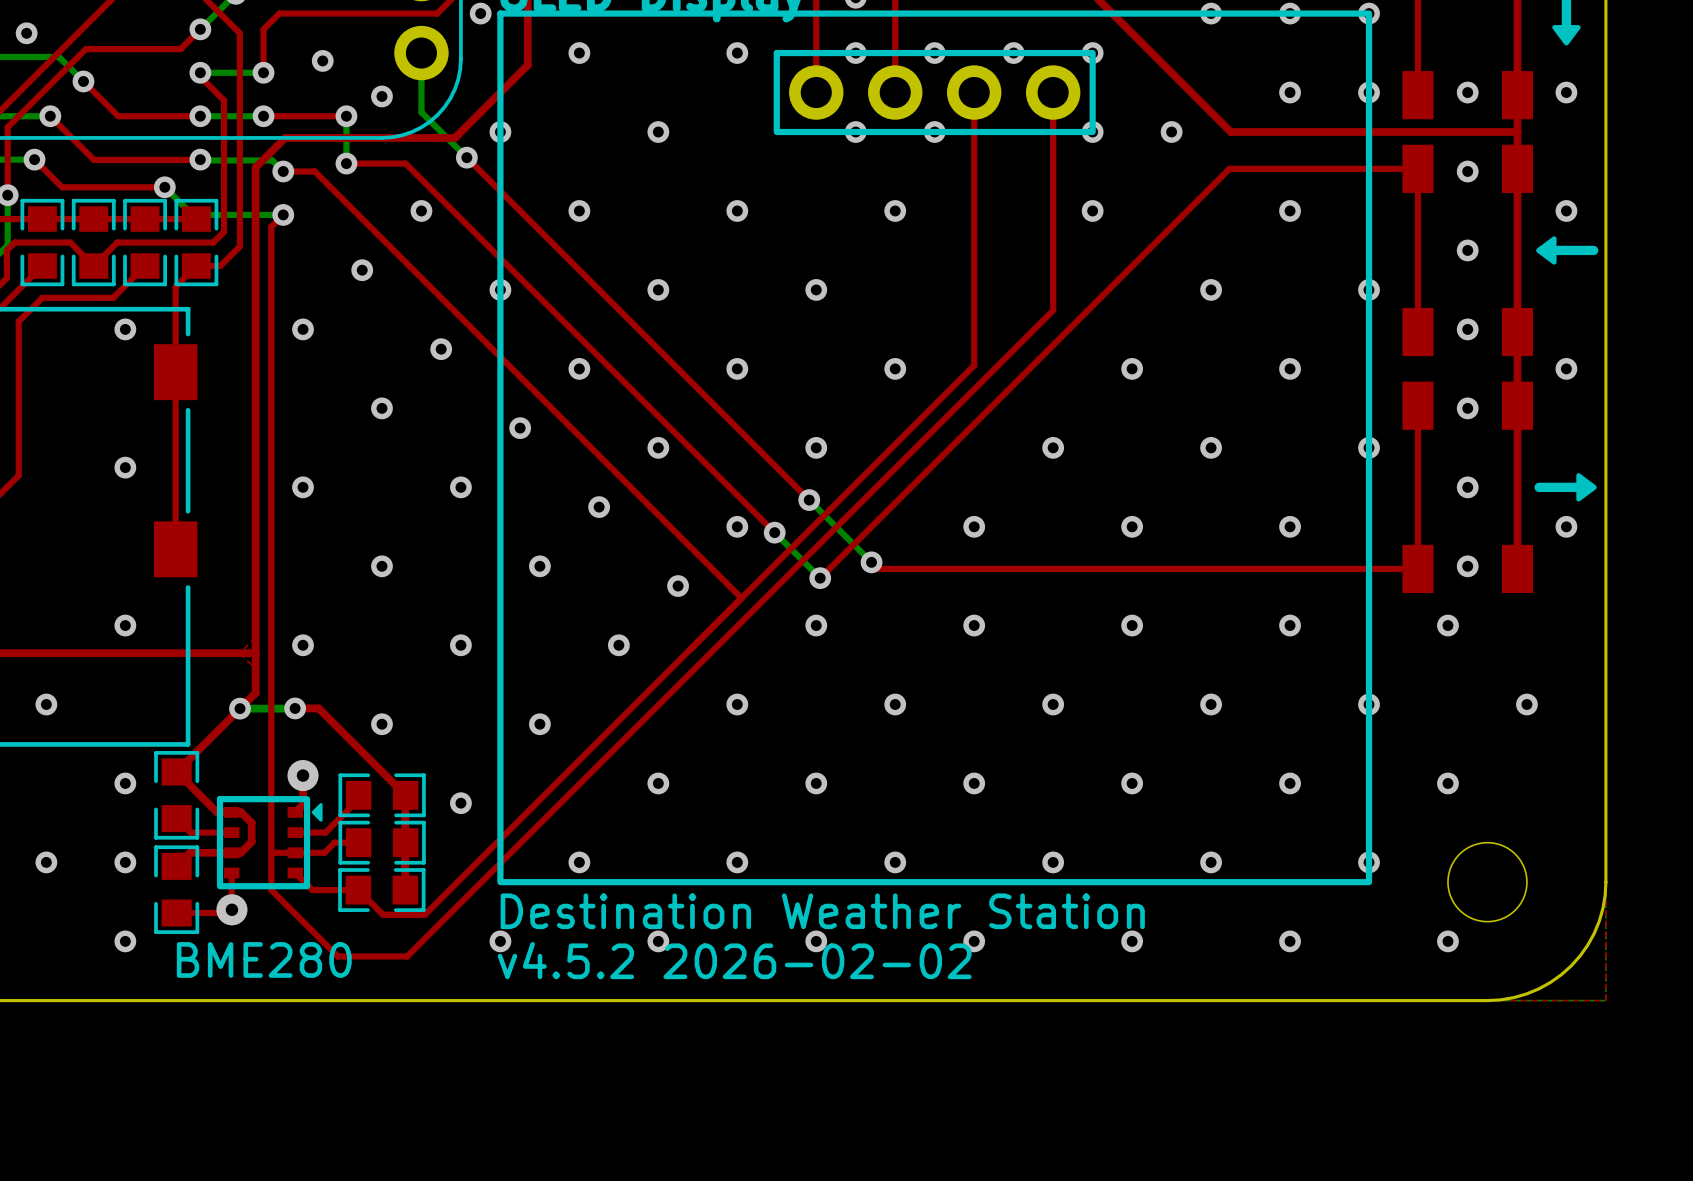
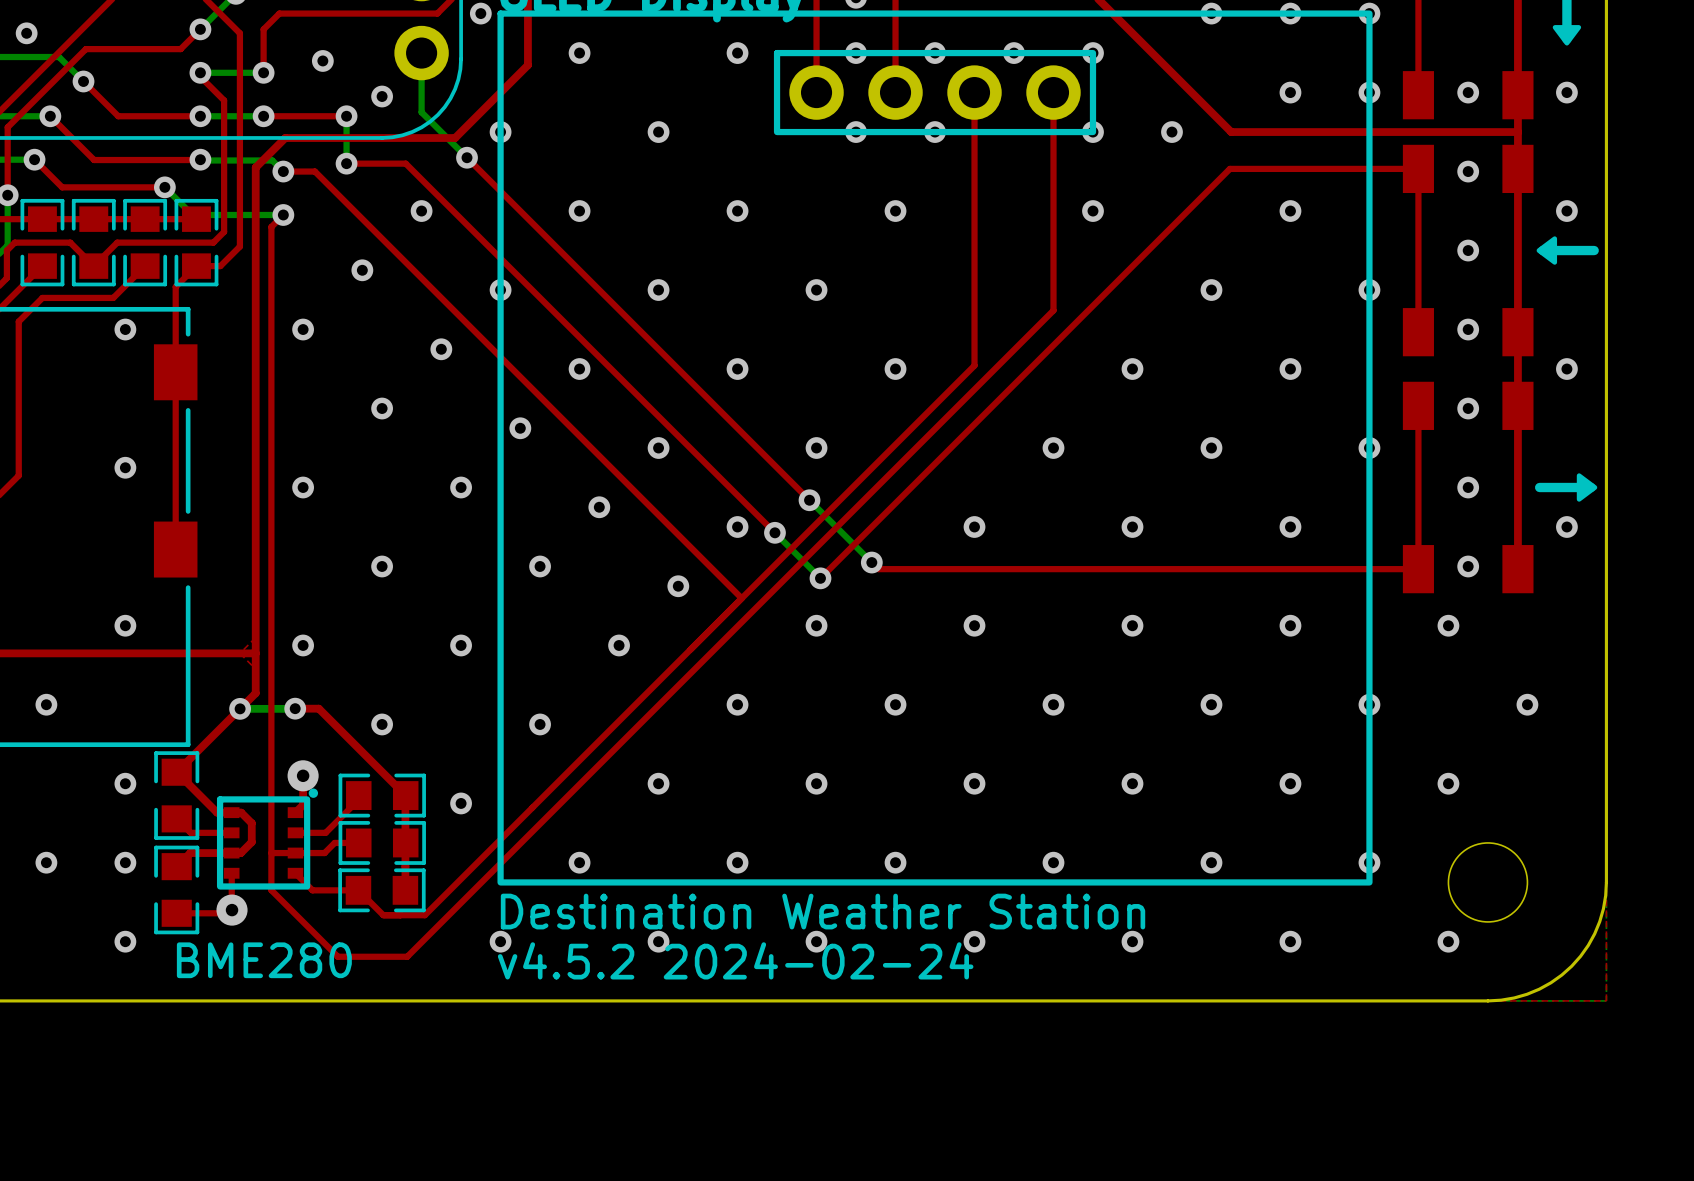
part footprint: [216, 796, 323, 890] -> [216, 788, 319, 890]
text: v4.5.2 2026-02-02 (734, 960) -> v4.5.2 2024-02-24 (735, 960)

